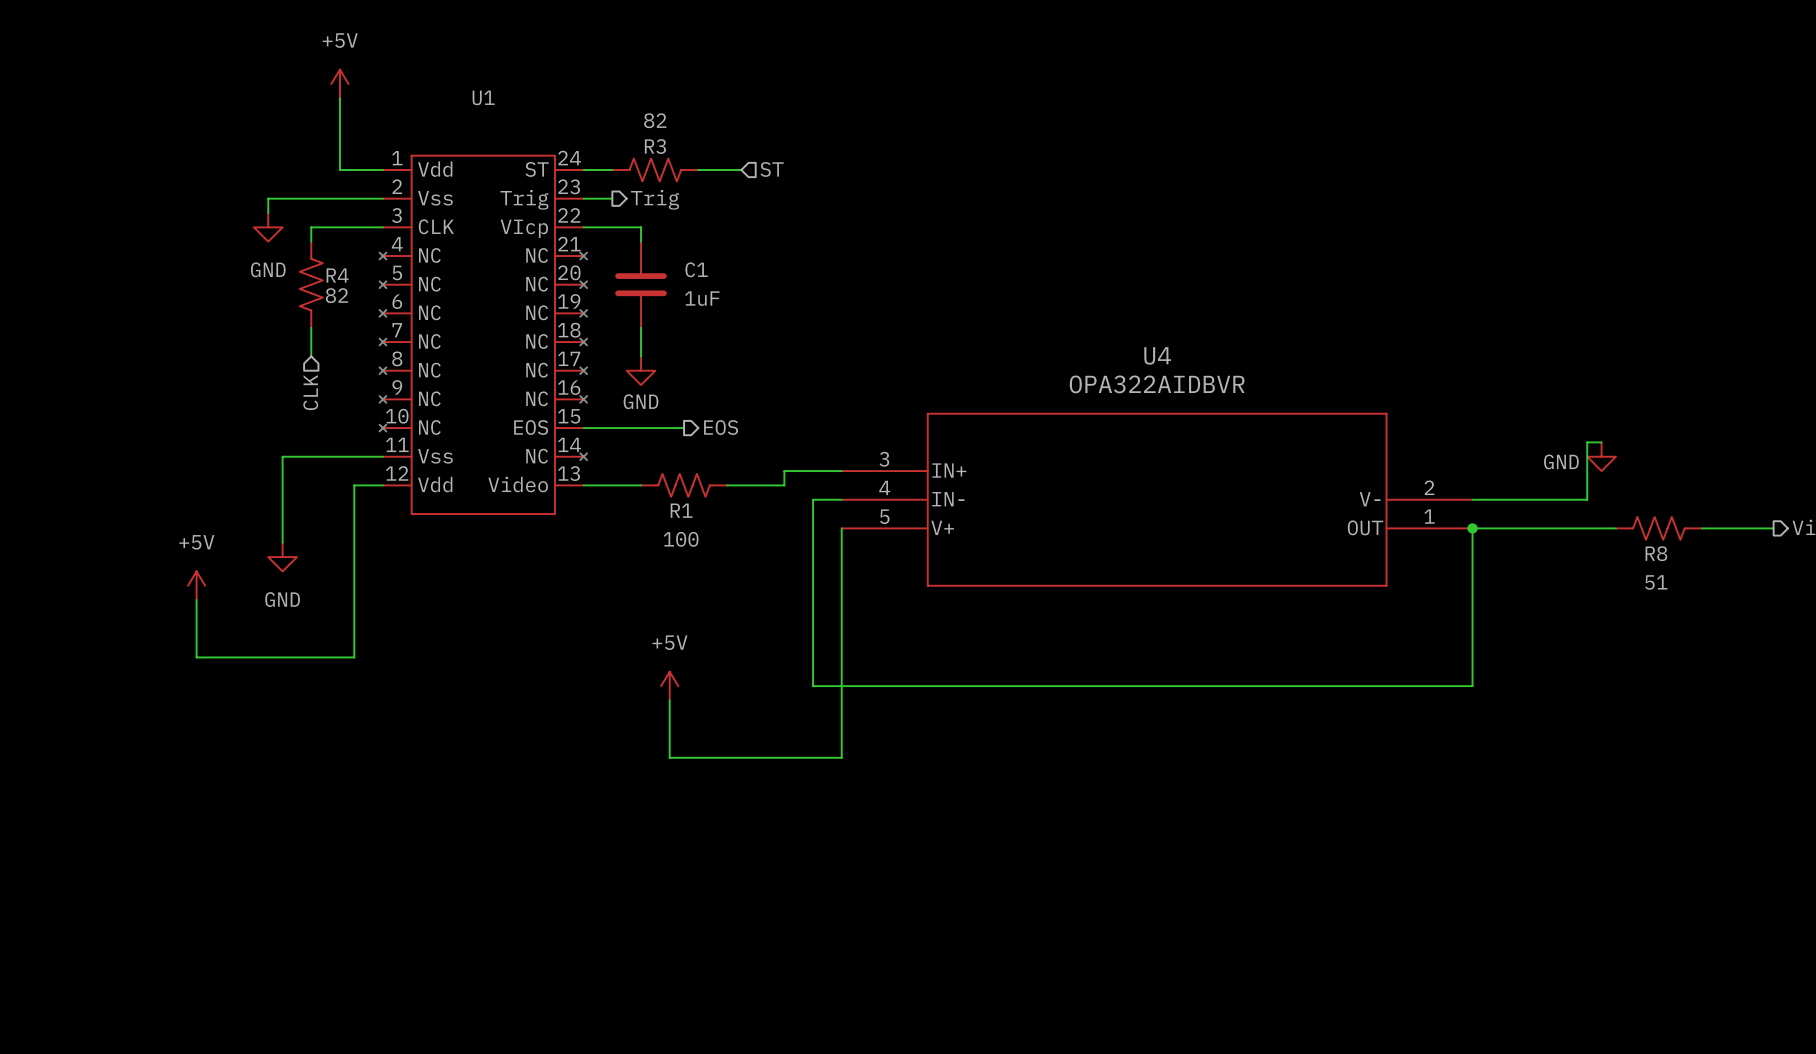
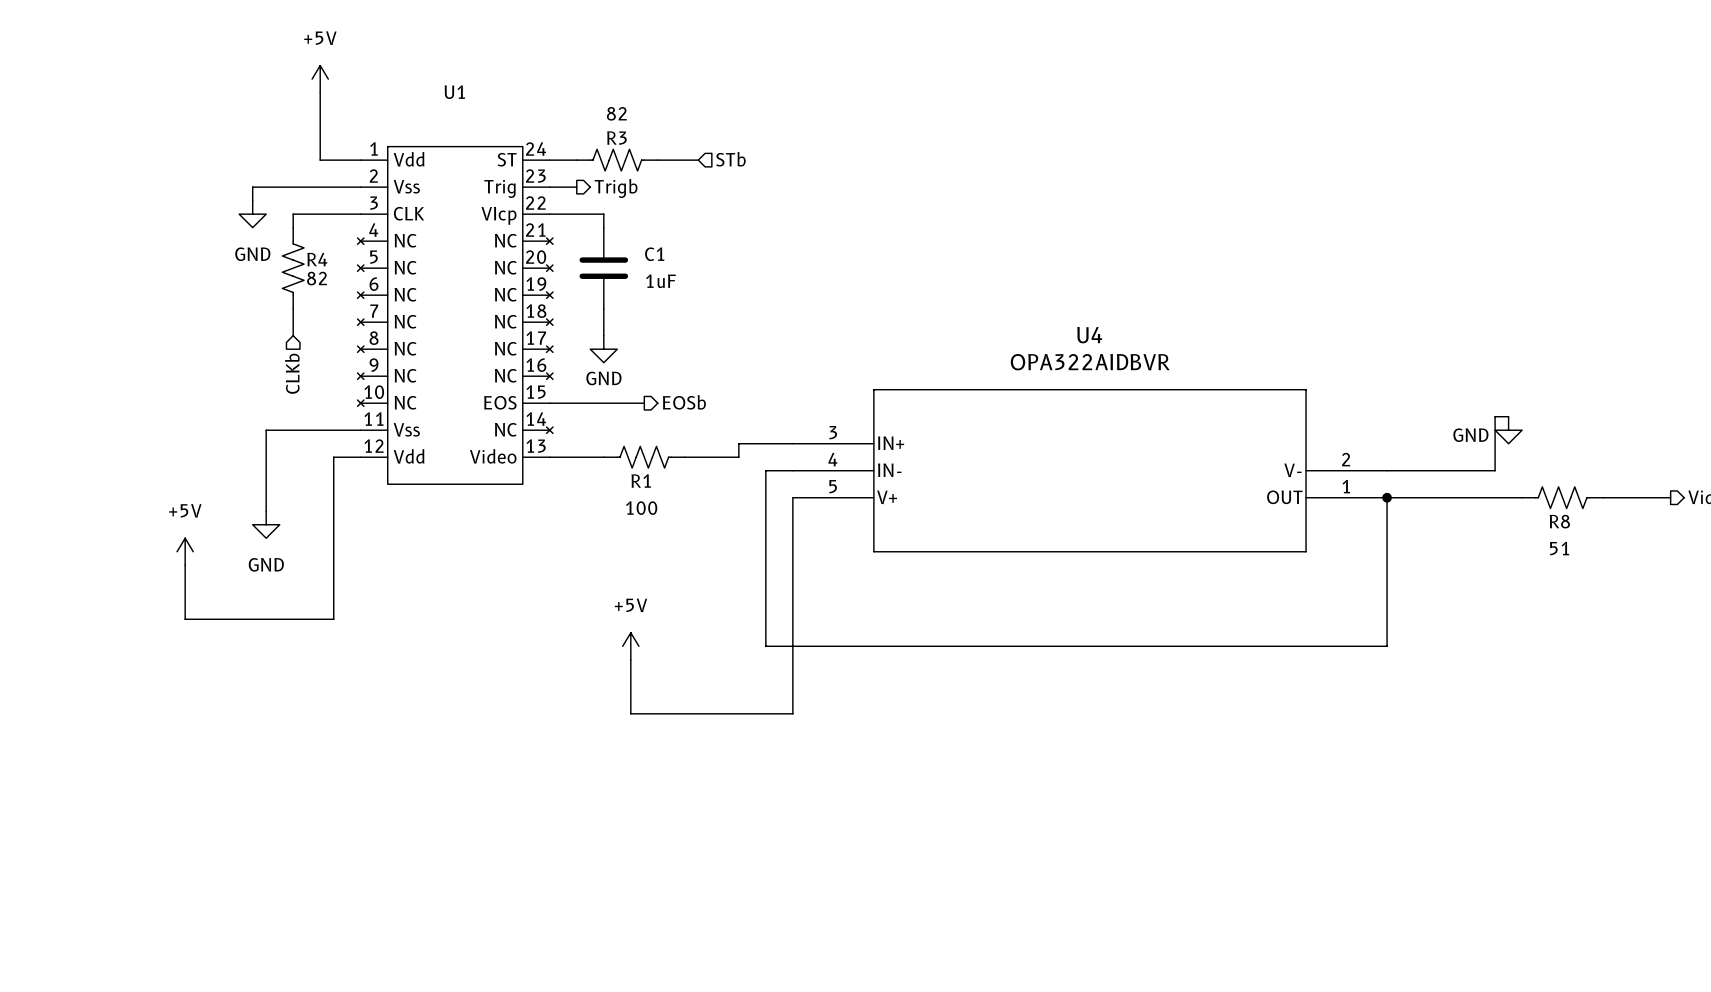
hierarchical label: ST (772, 169) -> STb (730, 159)
hierarchical label: Trig (655, 199) -> Trigb (616, 188)
hierarchical label: CLK (310, 392) -> CLKb (292, 373)
hierarchical label: EOS (721, 427) -> EOSb (684, 402)

